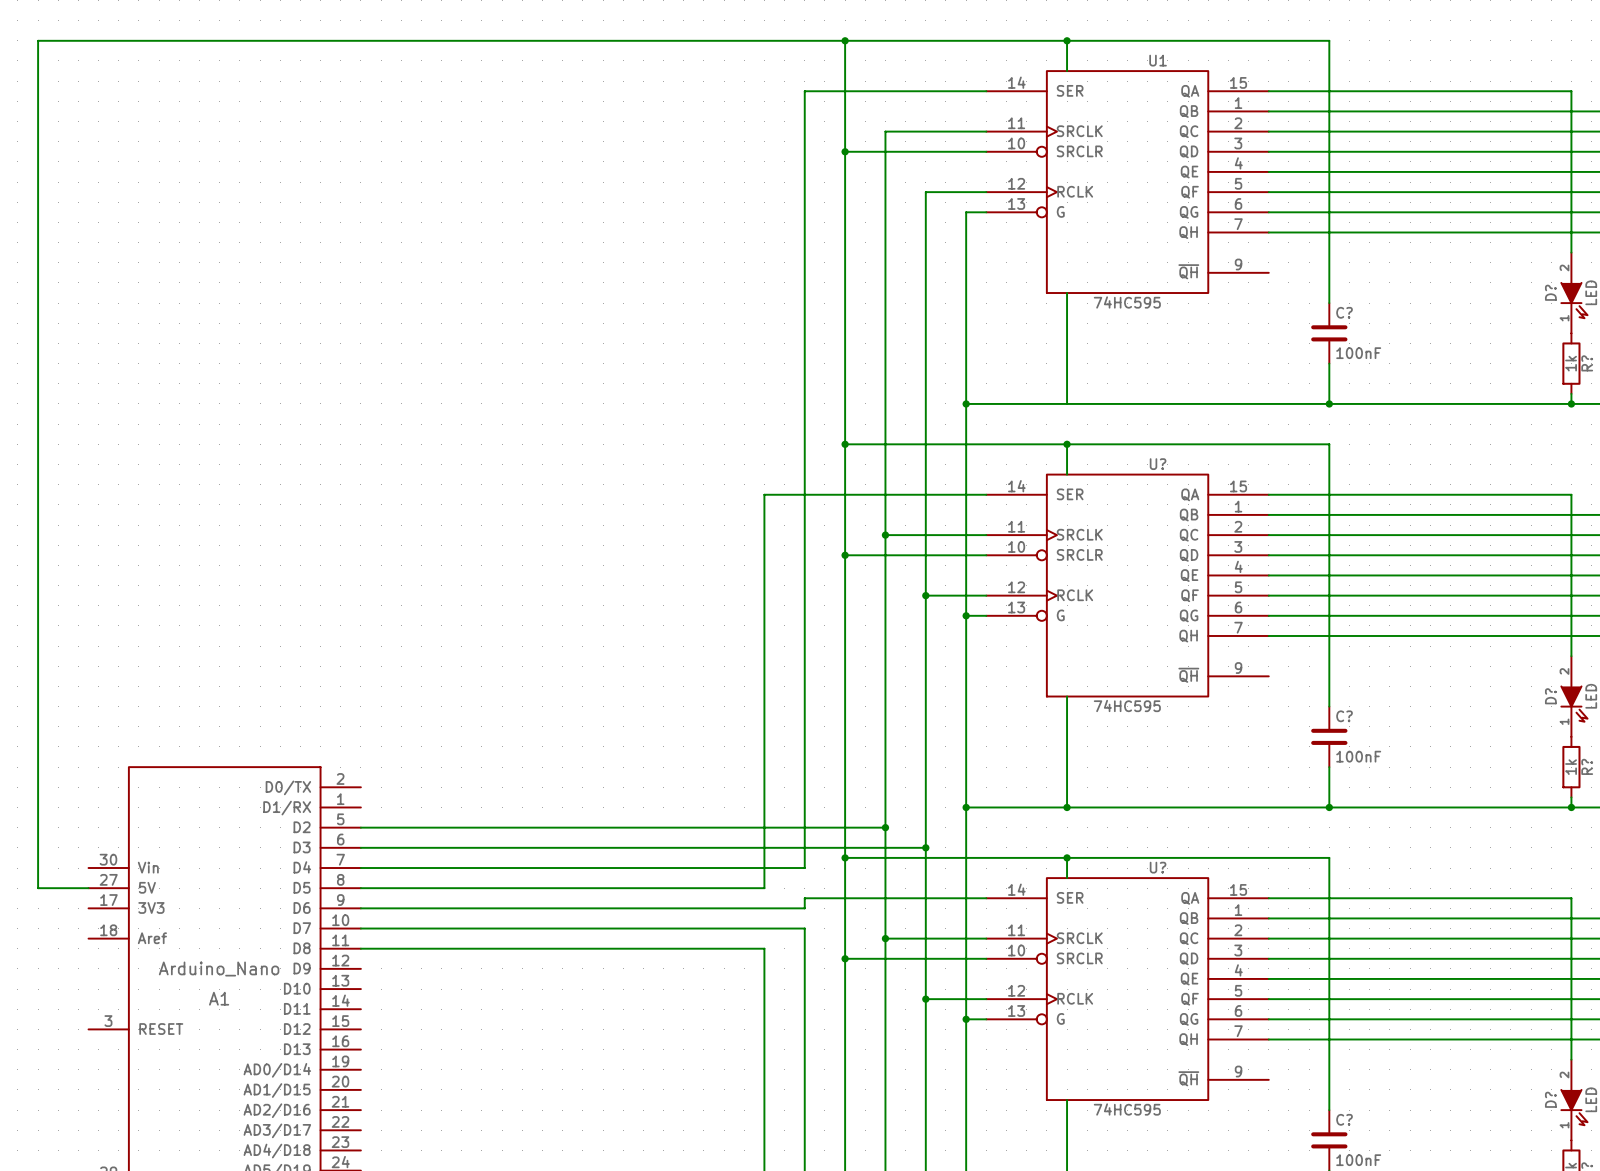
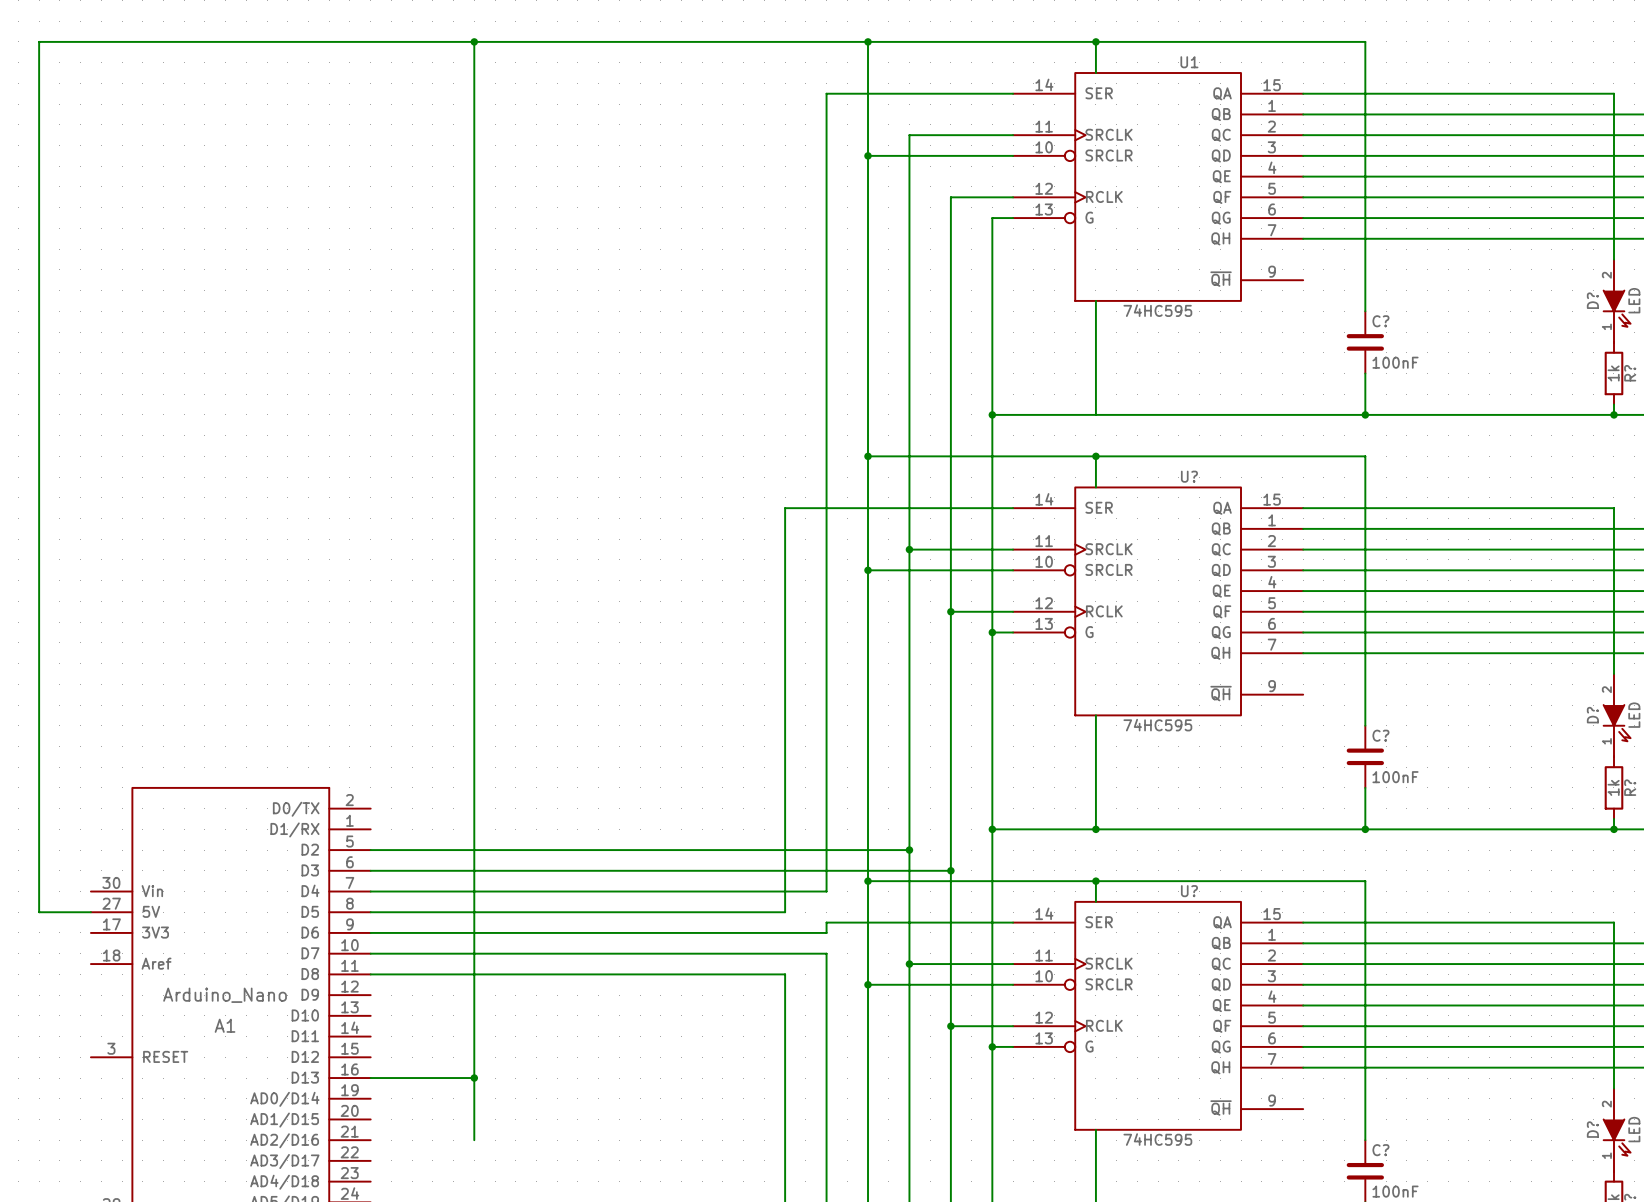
wire: none -> (474, 41) (474, 1140)
junction: none -> (474, 41)
wire: none -> (370, 1078) (474, 1078)
junction: none -> (474, 1078)

